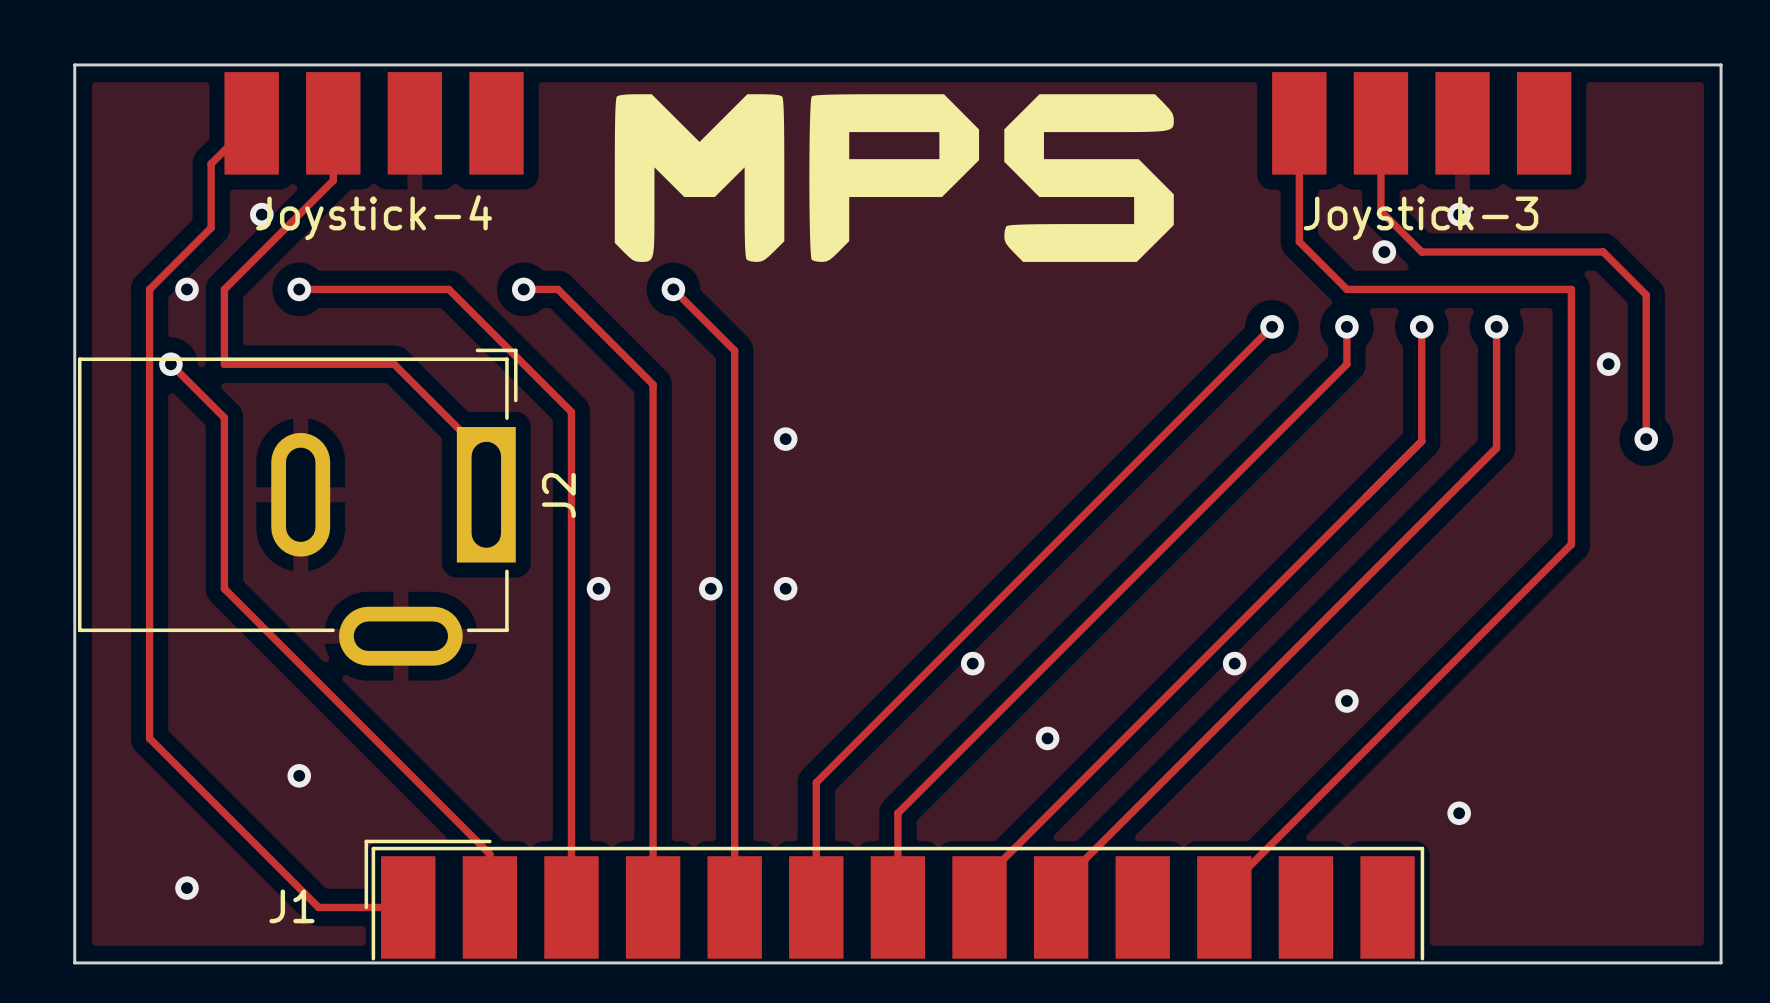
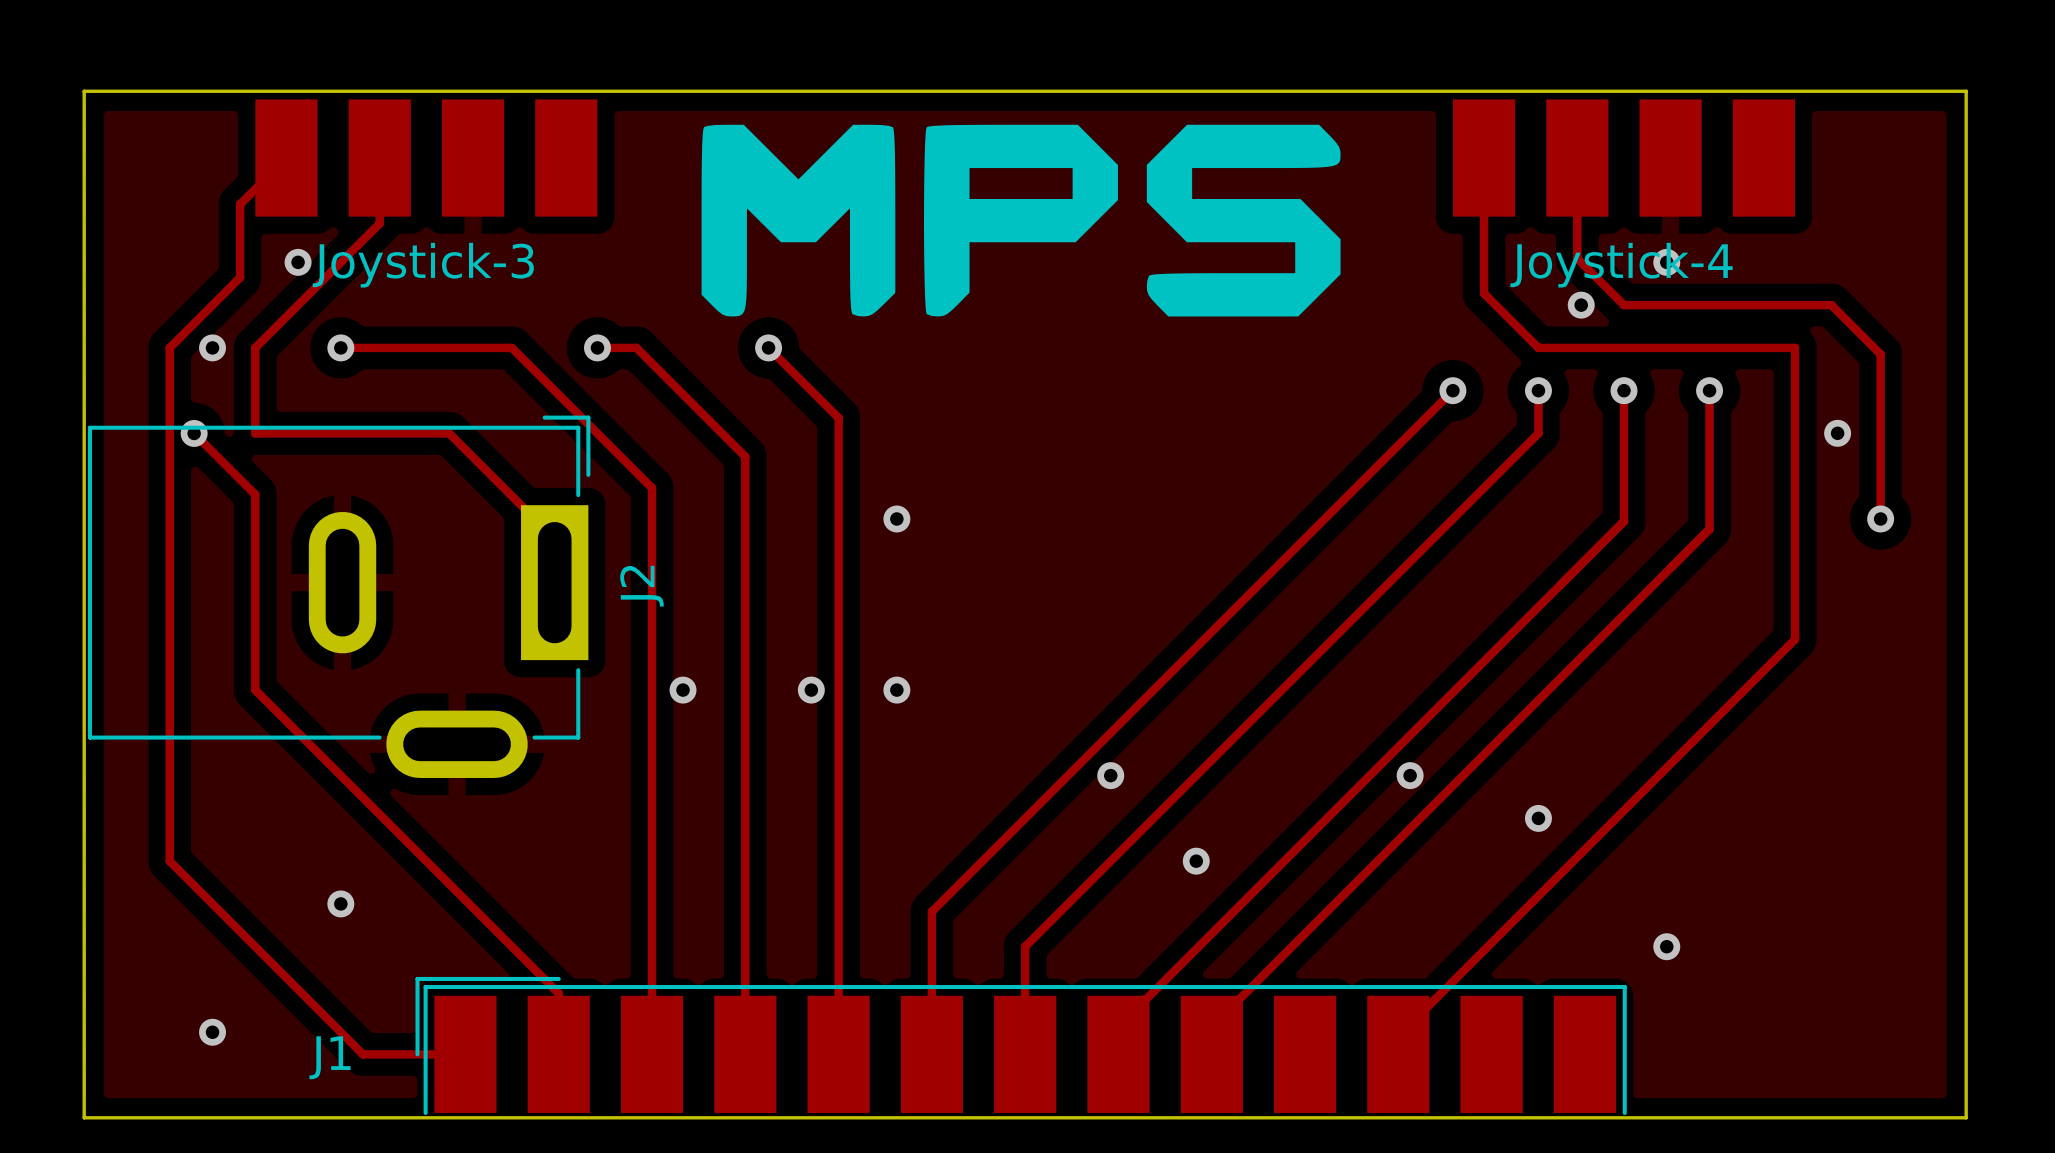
Joystick-4 name: Joystick-4 (374, 217) -> Joystick-3 (423, 265)
Joystick-3 name: Joystick-3 (1421, 218) -> Joystick-4 (1621, 265)

